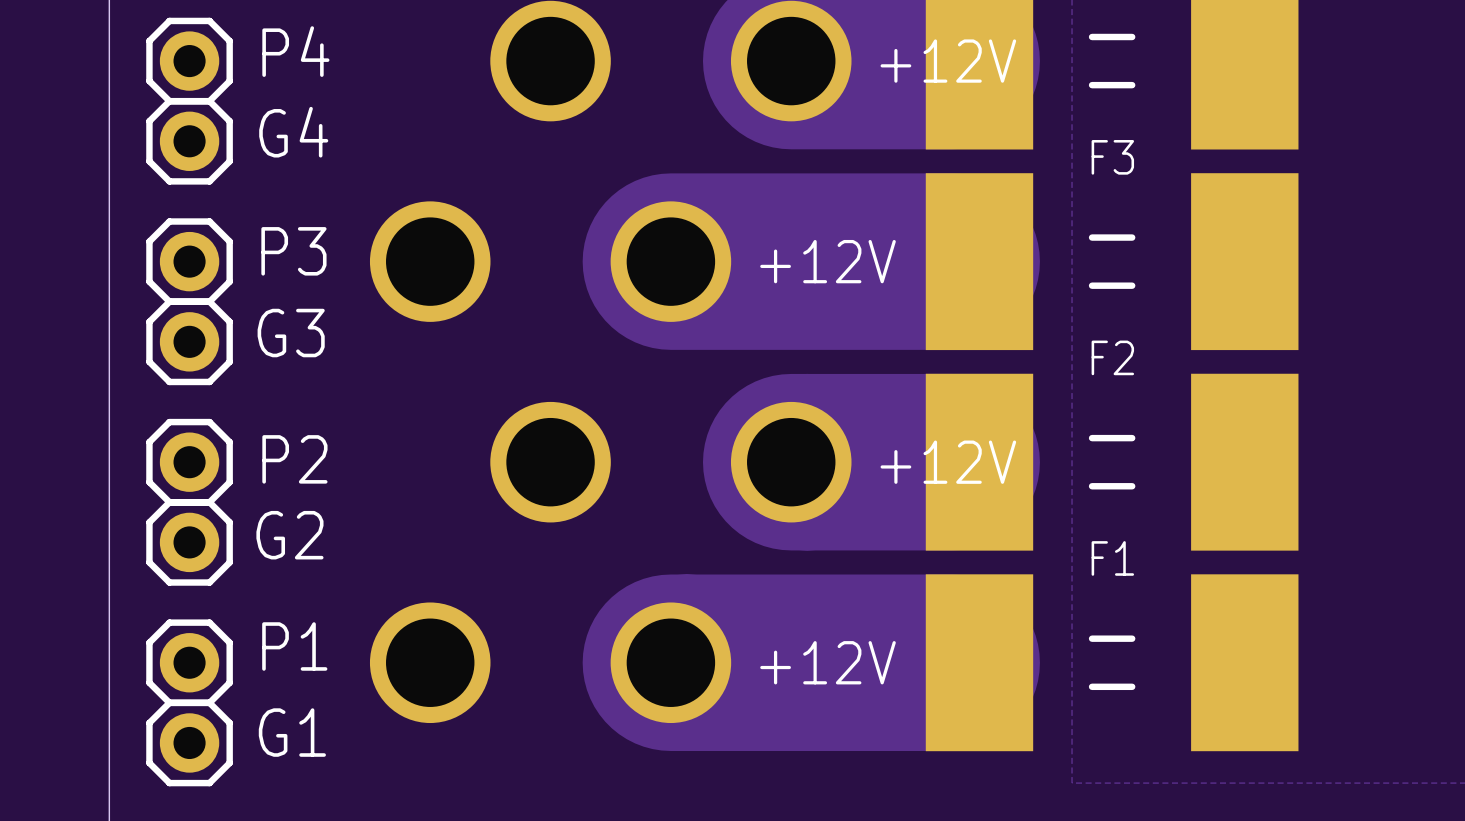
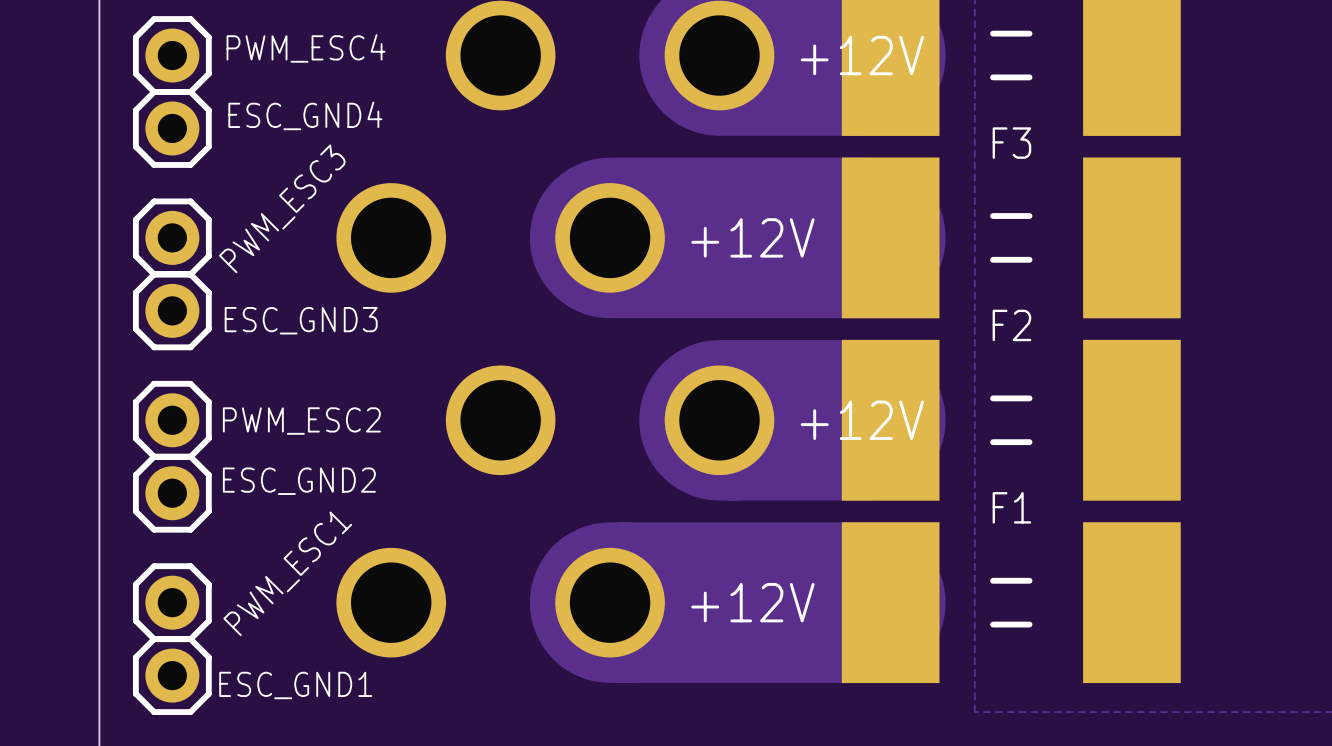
P4 name: P4 (295, 51) -> PWM_ESC4 (306, 48)
G4 name: G4 (293, 132) -> ESC_GND4 (305, 115)
P3 name: P3 (293, 251) -> PWM_ESC3 (282, 208)
G3 name: G3 (291, 333) -> ESC_GND3 (301, 320)
P2 name: P2 (294, 459) -> PWM_ESC2 (301, 421)
G2 name: G2 (289, 535) -> ESC_GND2 (299, 481)
P1 name: P1 (294, 646) -> PWM_ESC1 (287, 573)
G1 name: G1 (292, 732) -> ESC_GND1 (295, 685)

